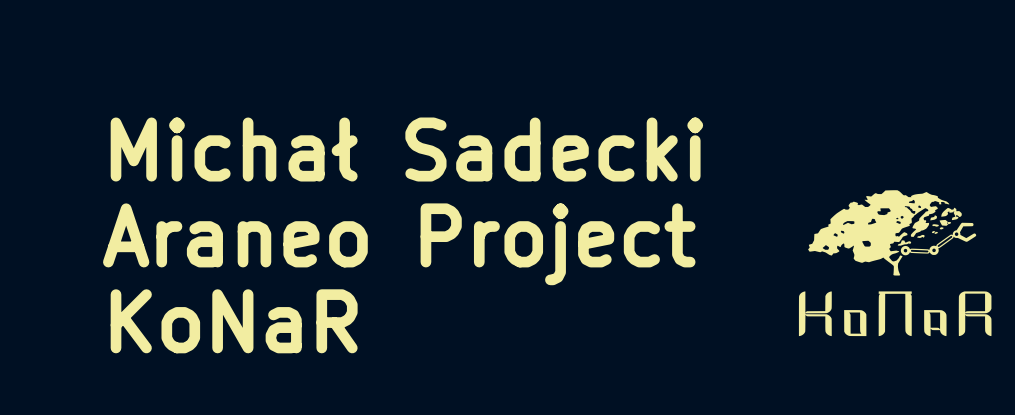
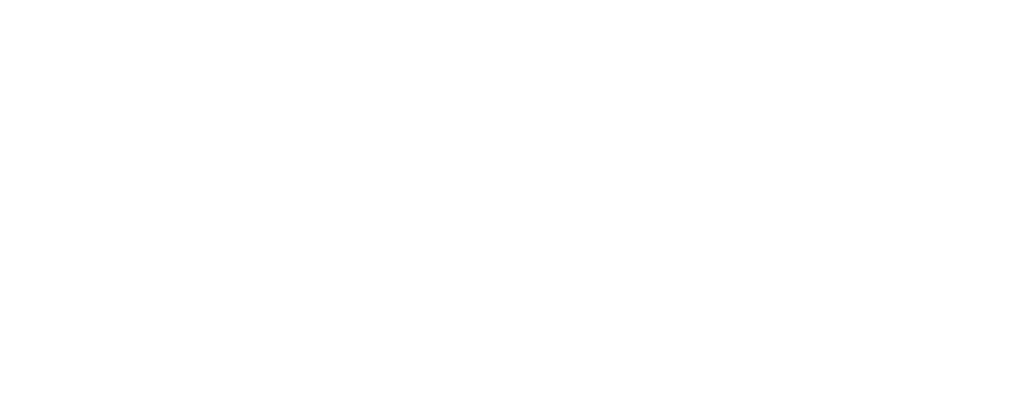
text: Michał Sadecki (406, 149) -> none
drawing: [798, 190, 992, 337] -> none
text: Araneo Project (399, 244) -> none
text: KoNaR (234, 321) -> none

